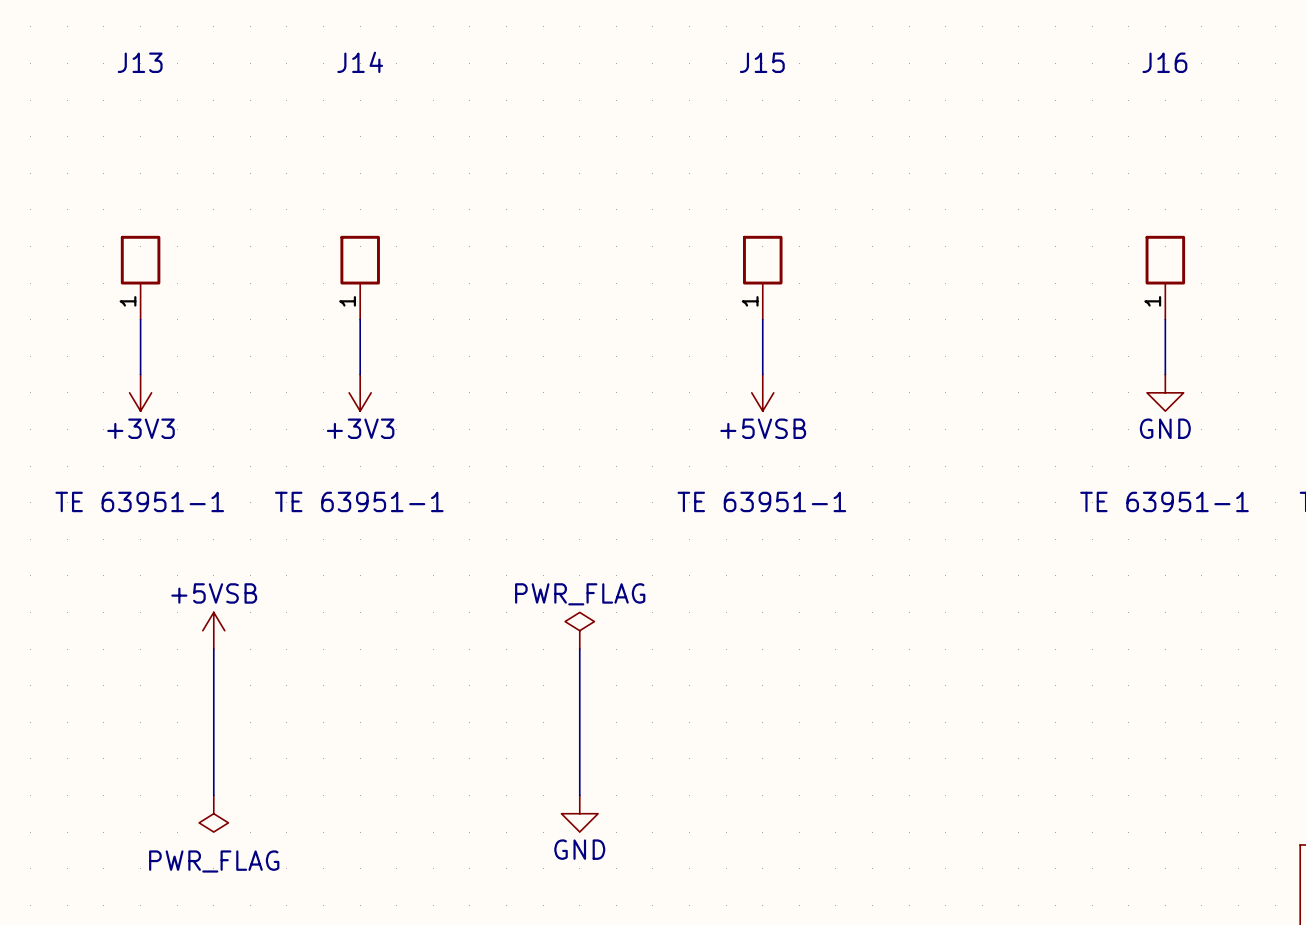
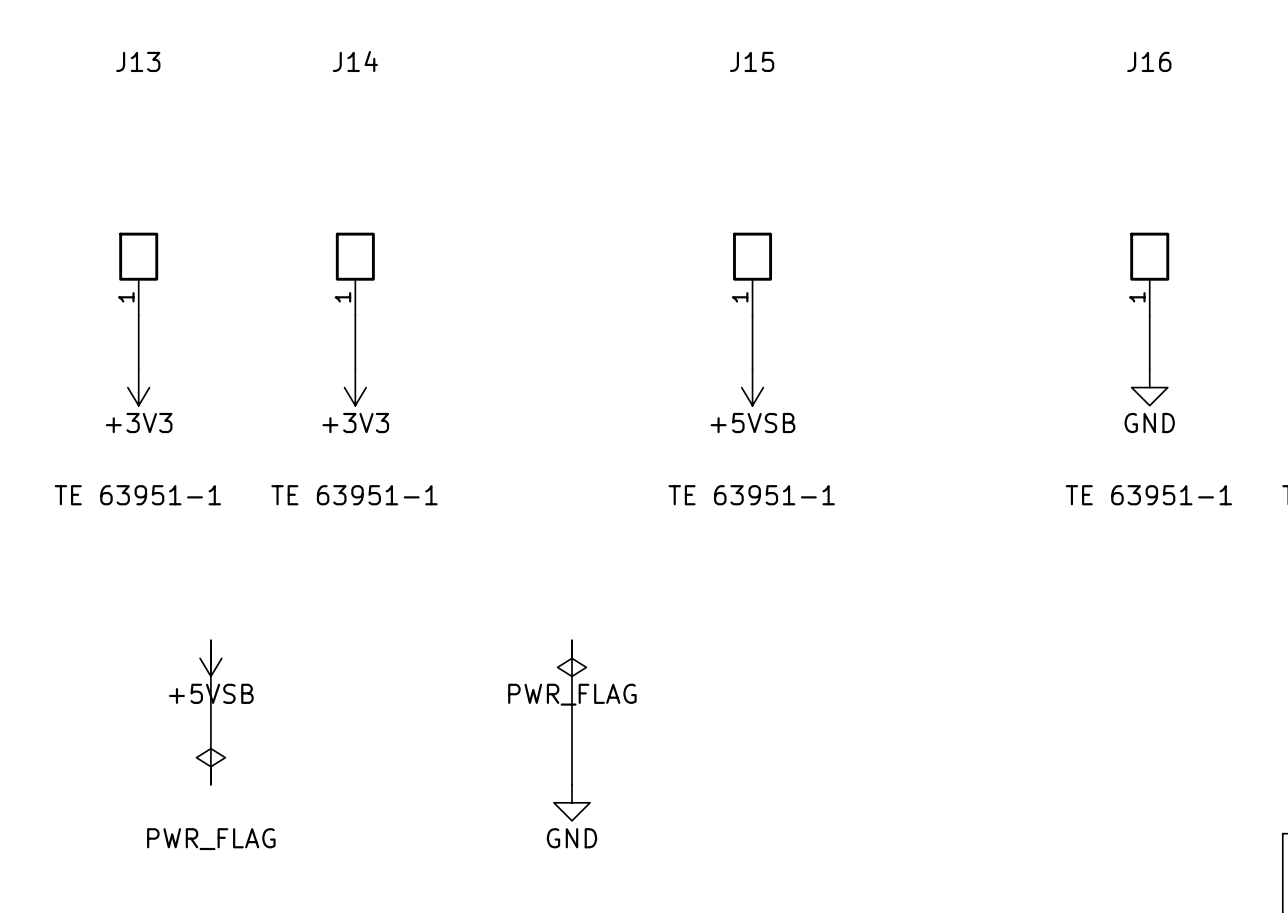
power symbol rotation: 0° (213, 630) -> 180° (210, 658)
power symbol position: +5VSB (213, 630) -> +5VSB (210, 658)
power symbol rotation: 0° (579, 630) -> 180° (572, 658)
power symbol position: PWR_FLAG (579, 630) -> PWR_FLAG (572, 658)
power symbol rotation: 0° (213, 813) -> 180° (210, 766)
power symbol position: PWR_FLAG (213, 813) -> PWR_FLAG (210, 766)

